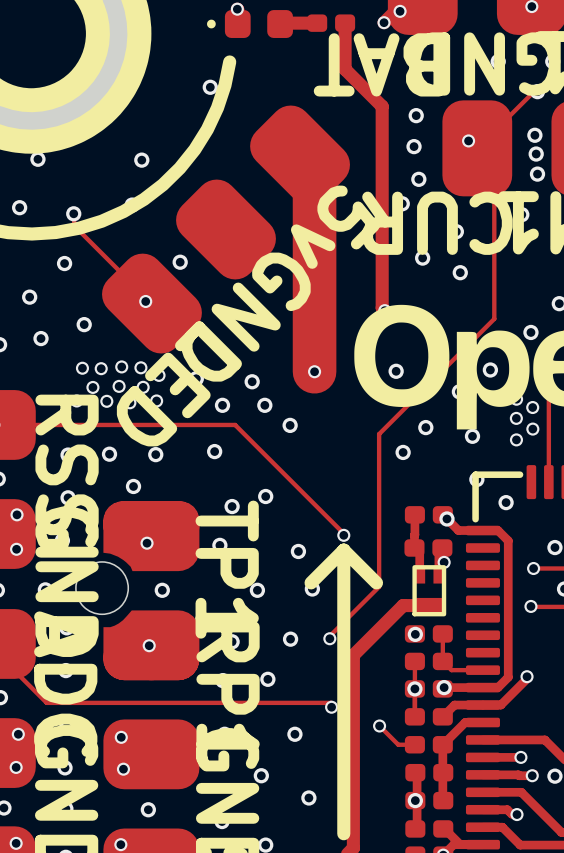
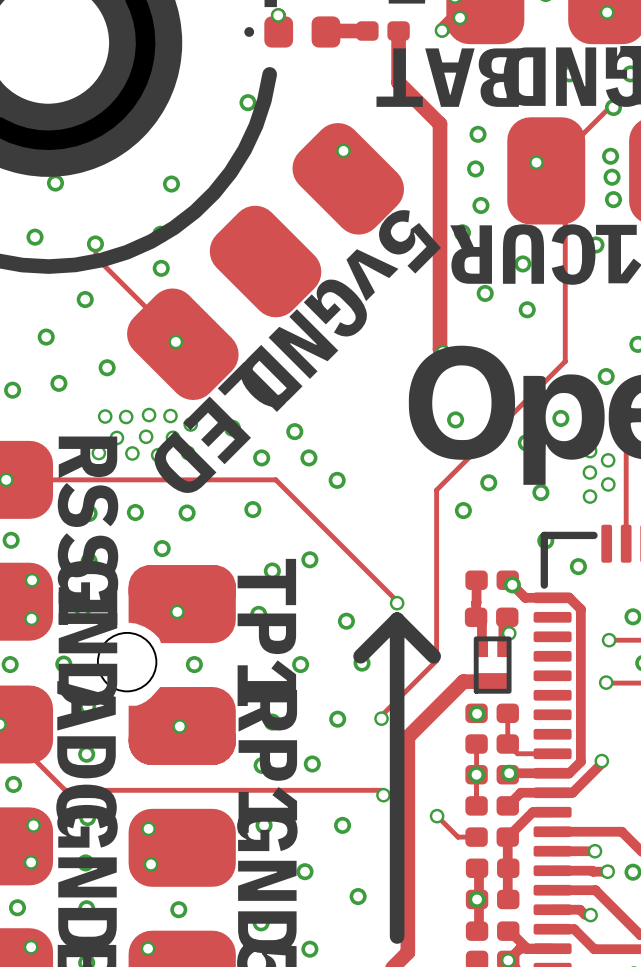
track: (300, 155) (314, 169) (314, 371) -> none
via position: (180, 262) -> (161, 268)
via position: (314, 371) -> (343, 150)

